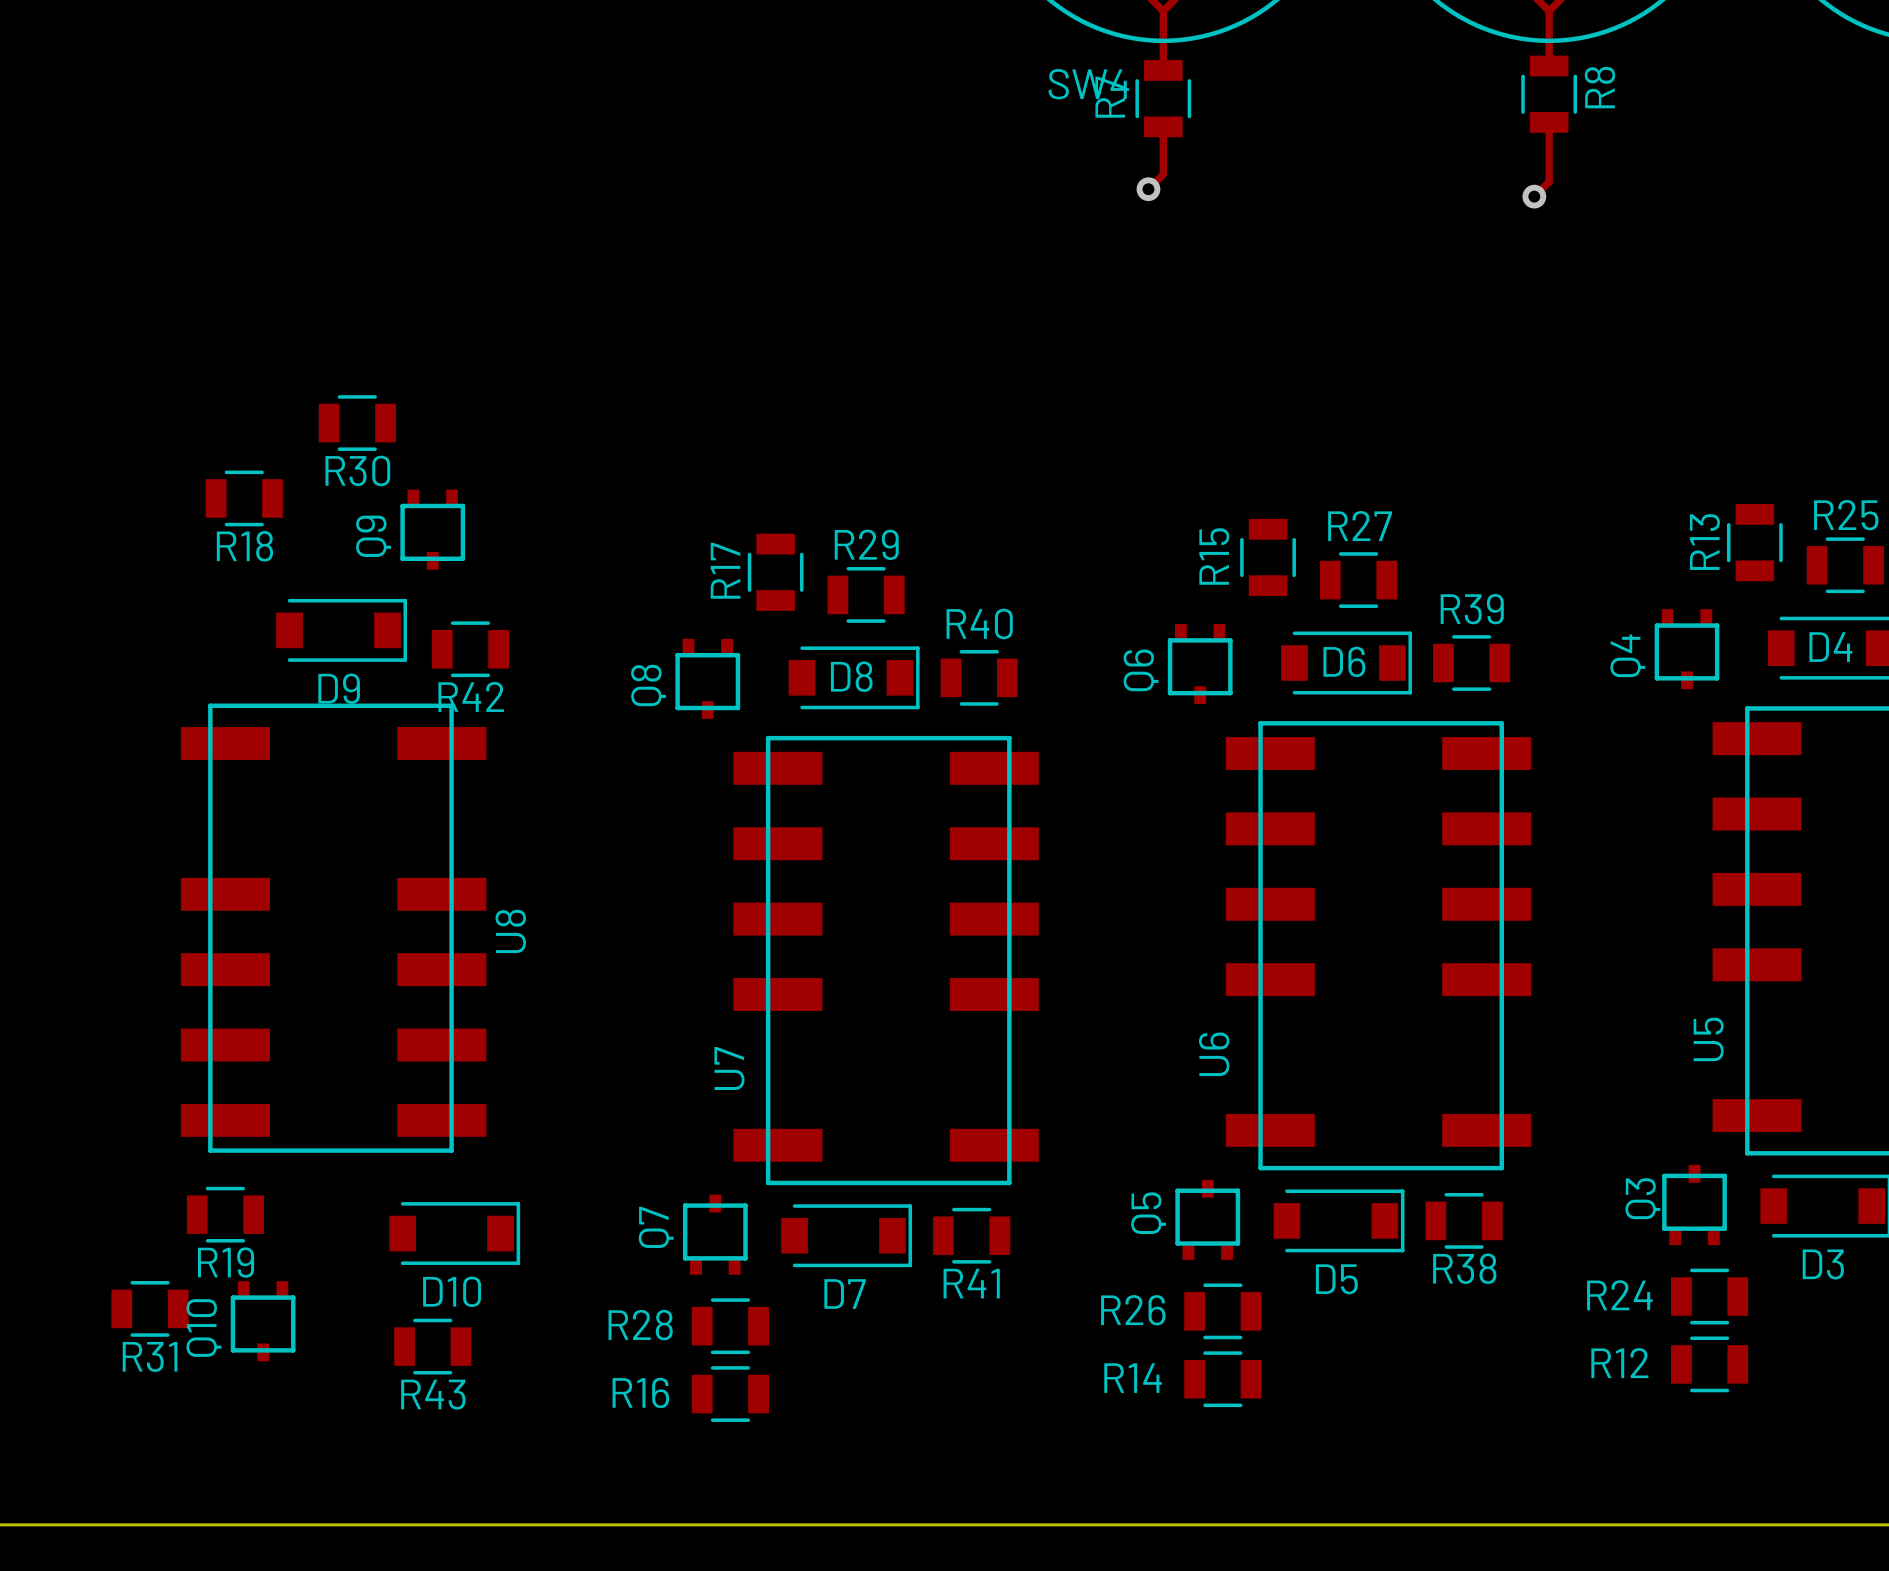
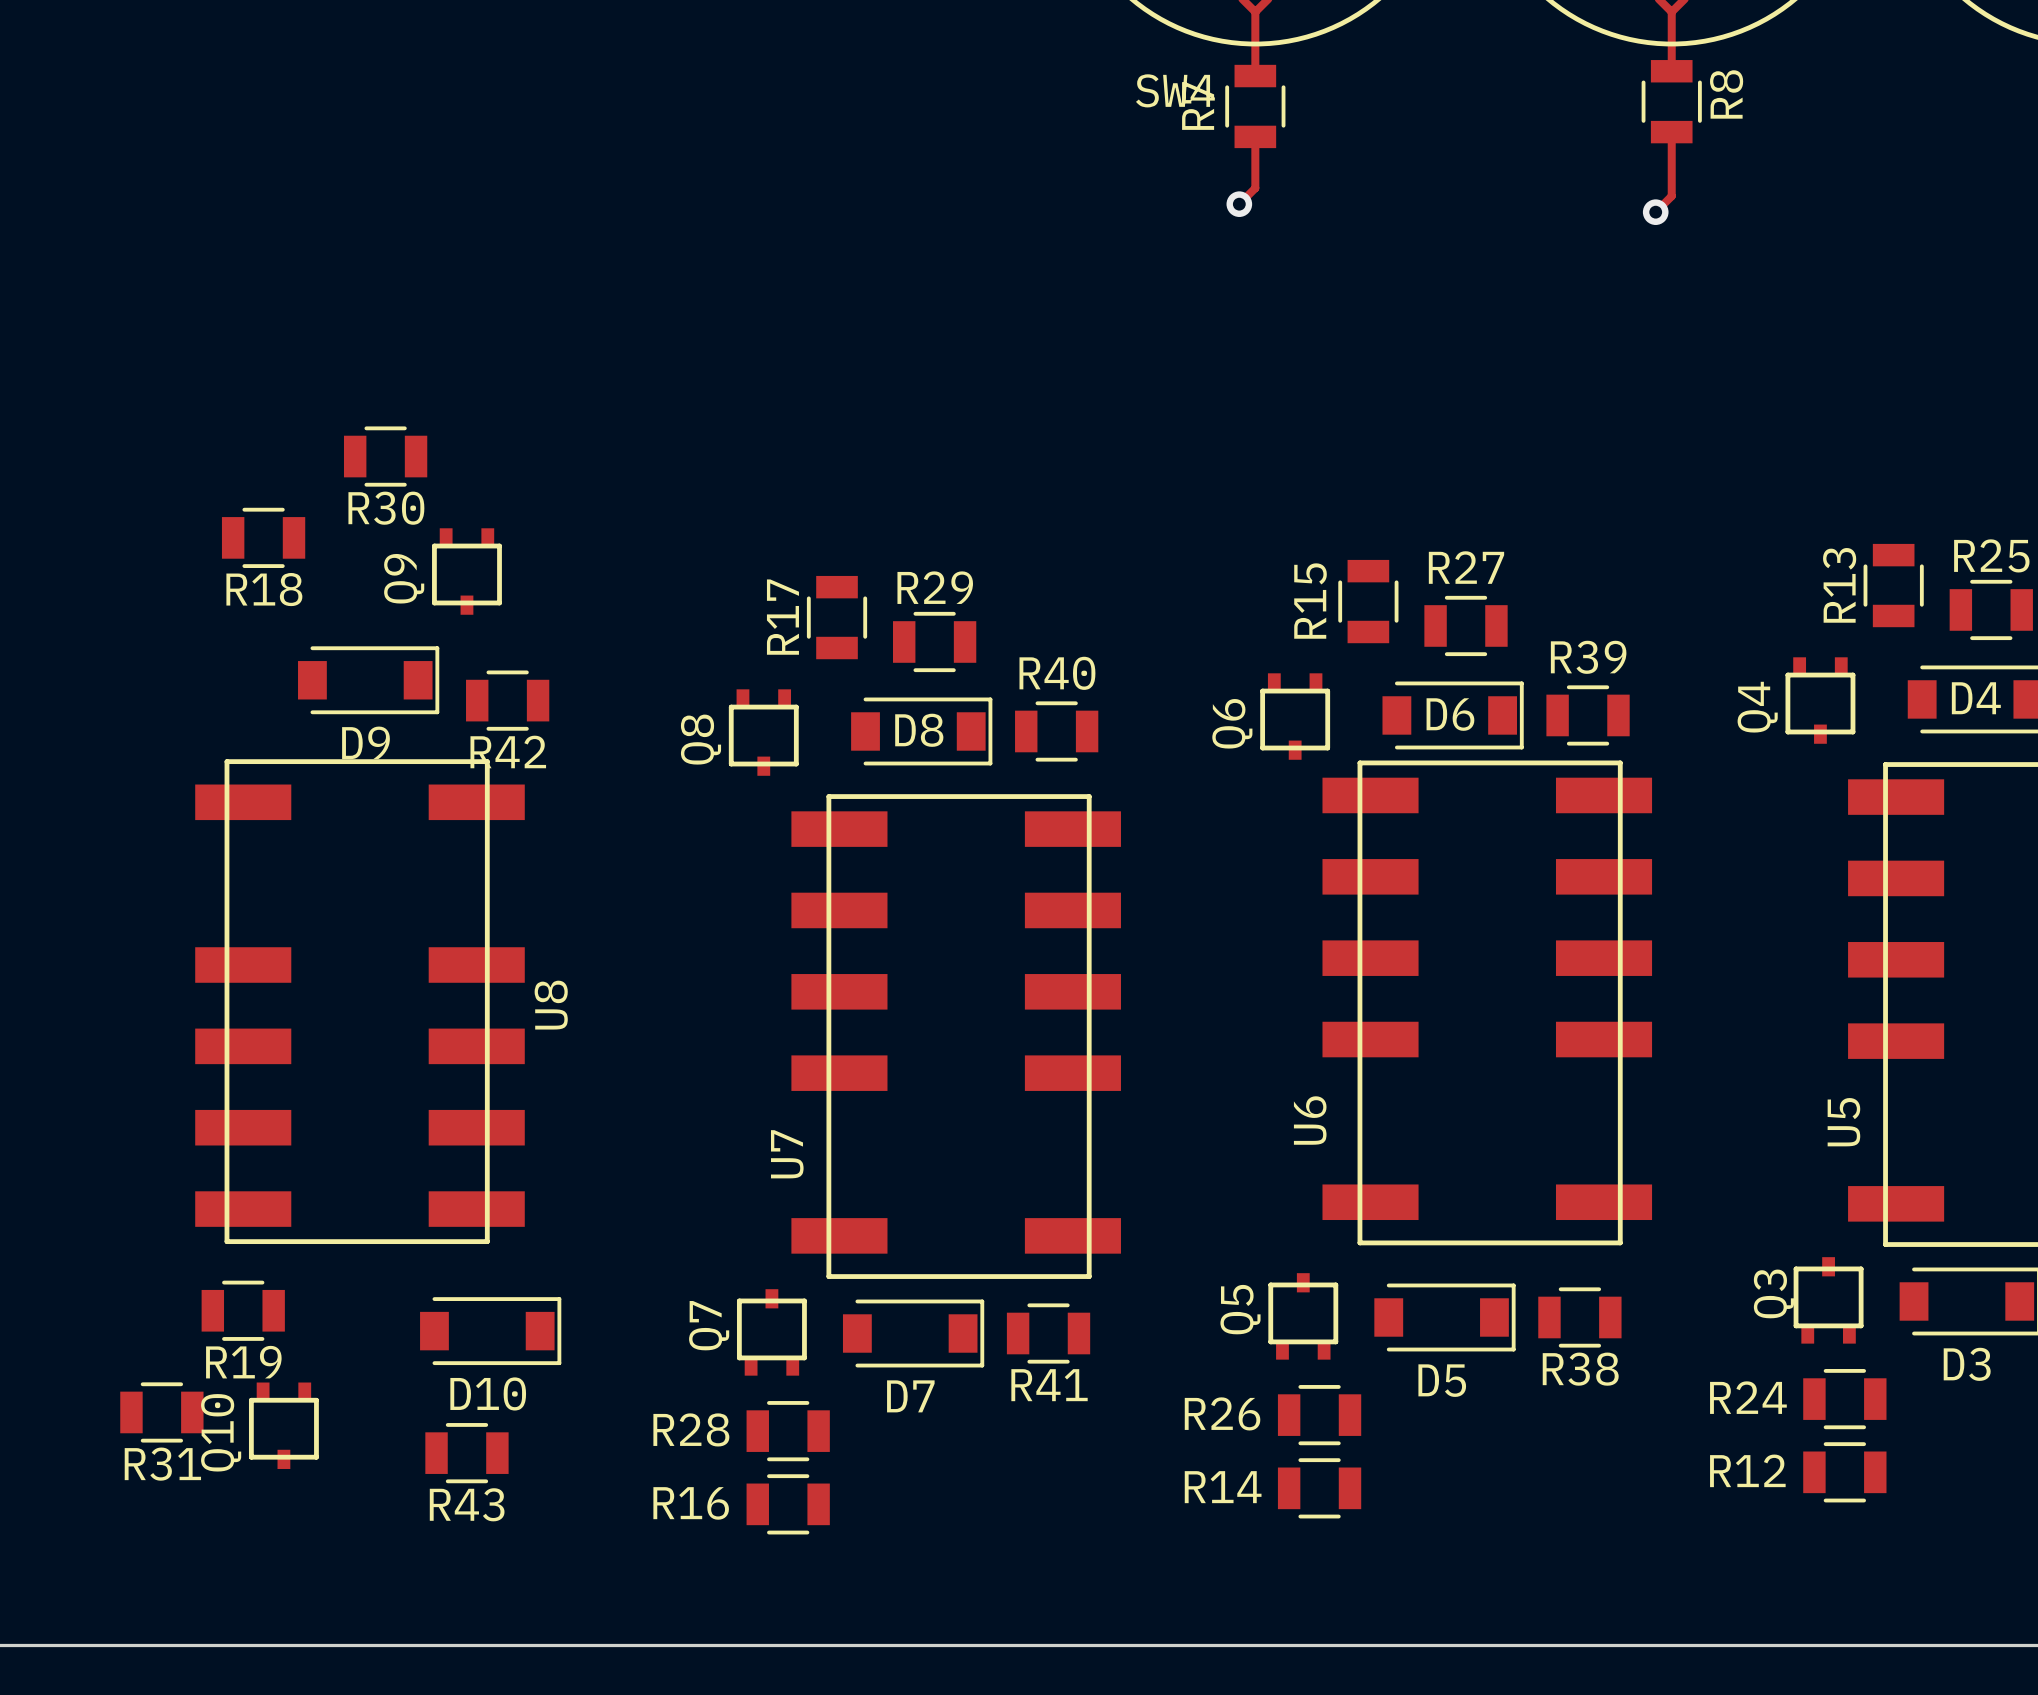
U6 position: (1378, 945) -> (1487, 1002)

